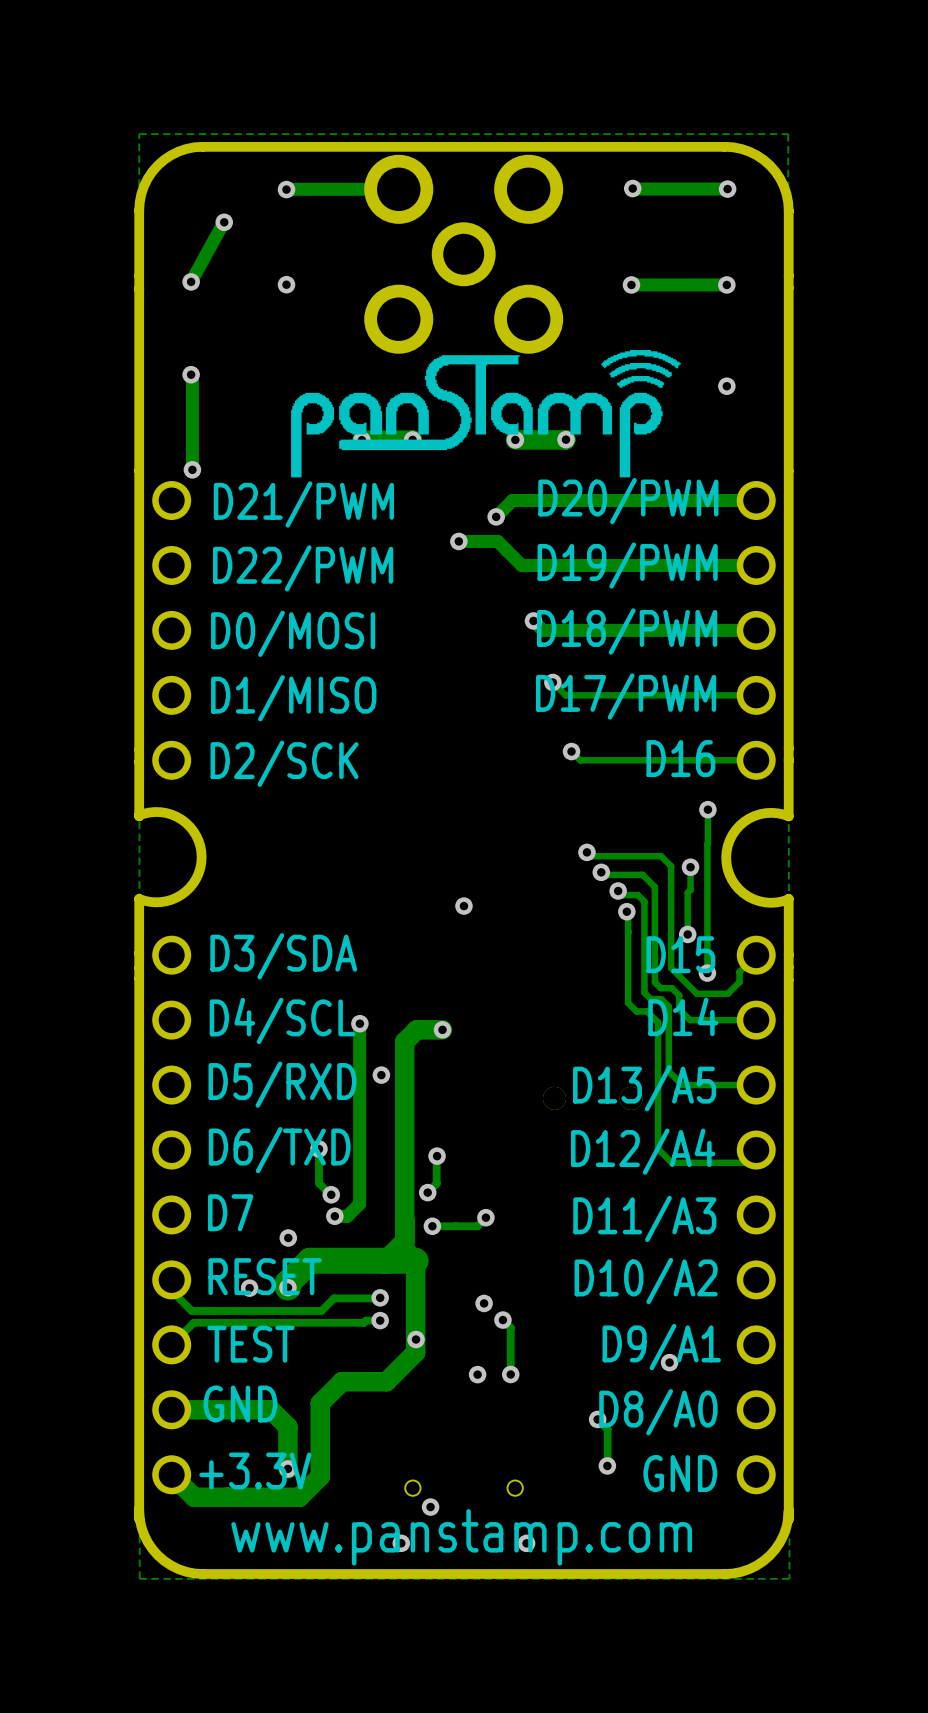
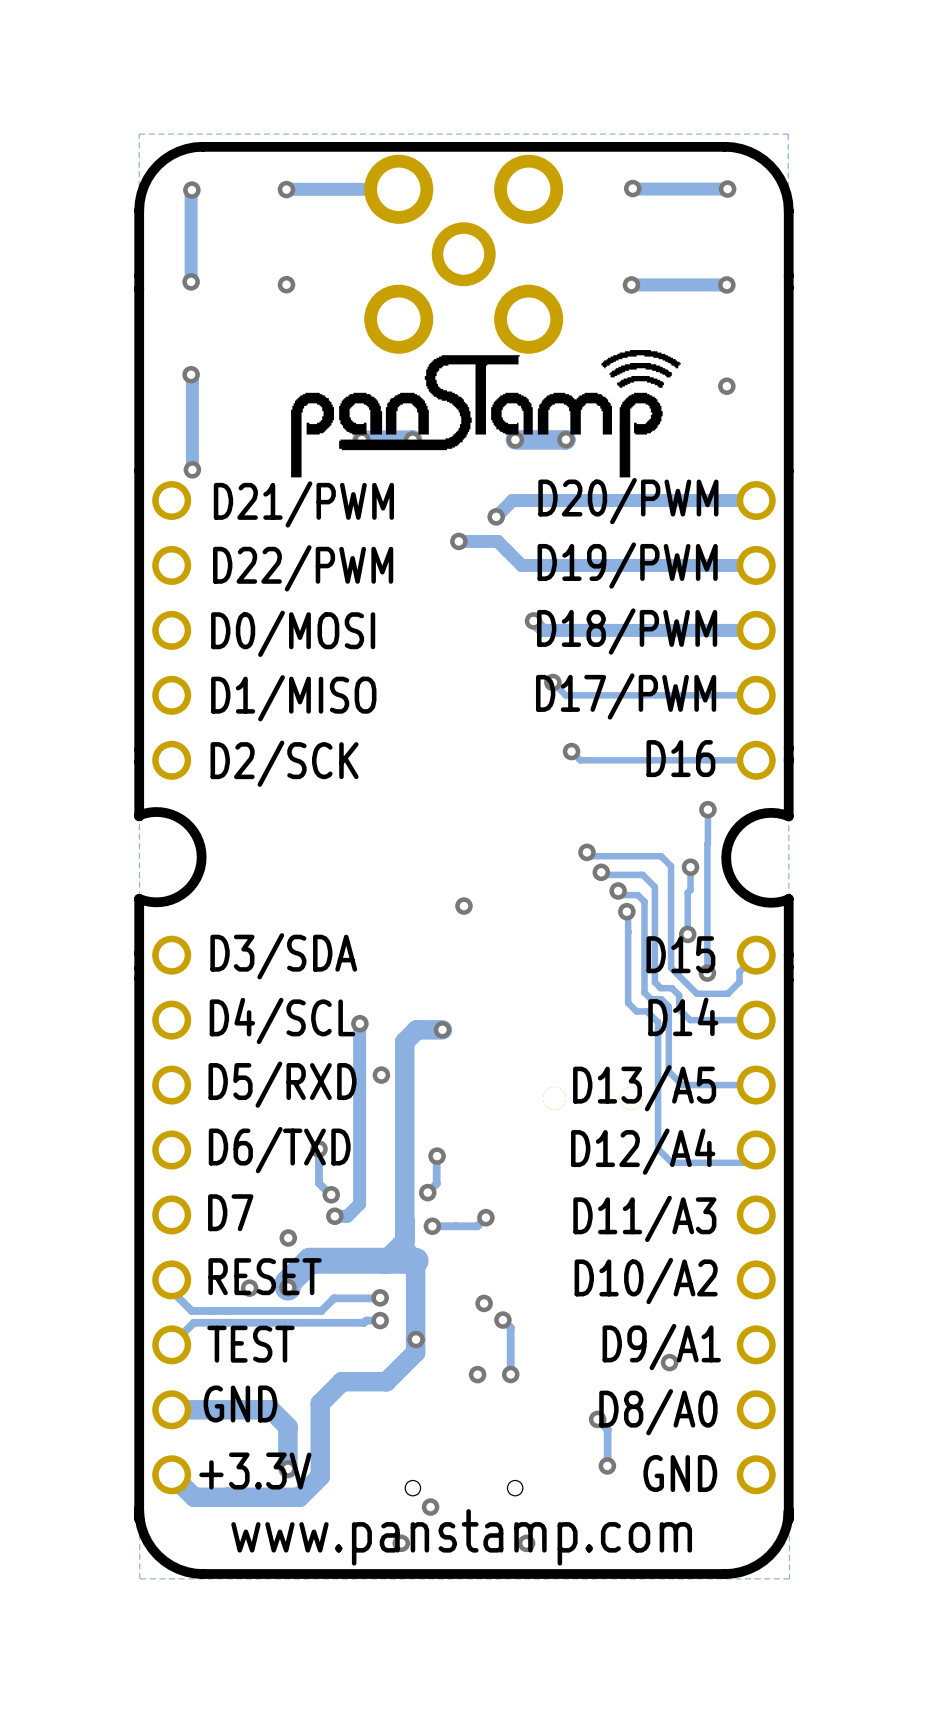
track: (224, 222) (191, 281) -> (191, 190) (191, 281)
via position: (224, 222) -> (191, 190)

